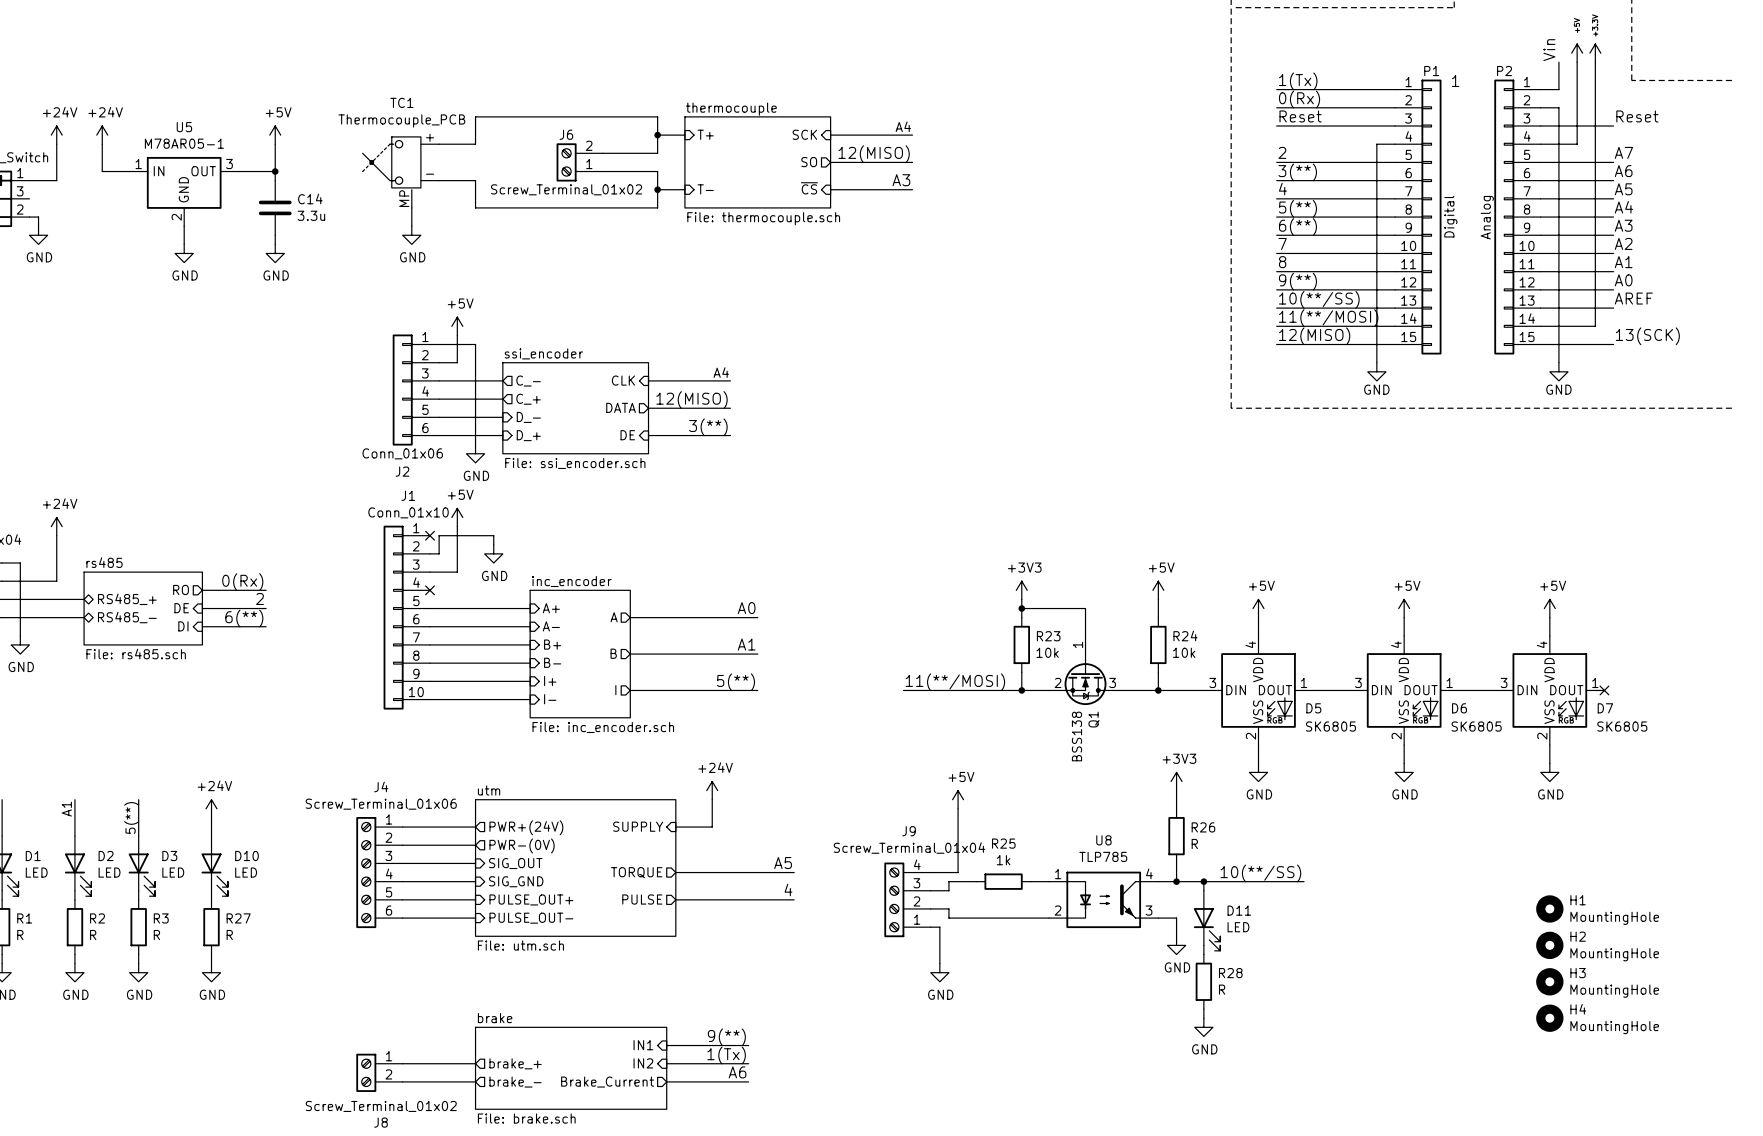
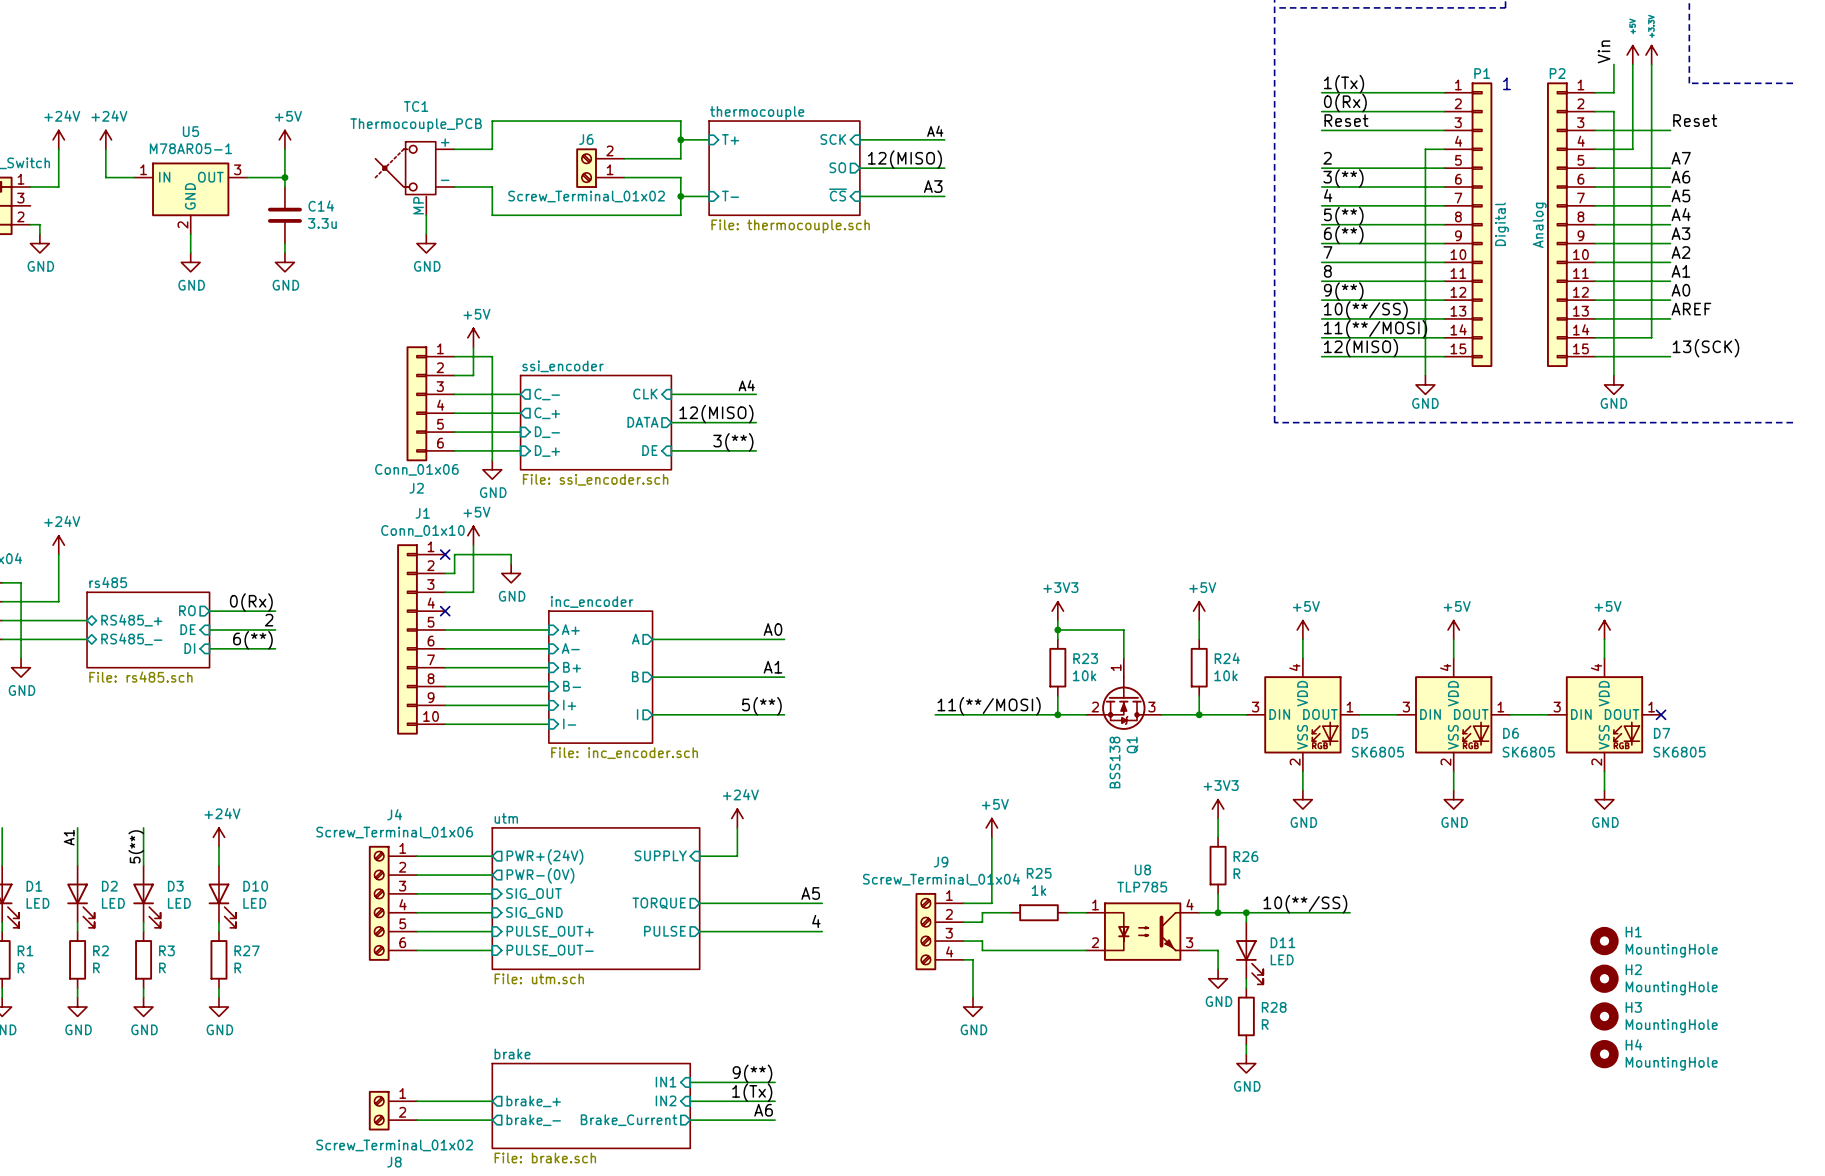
J9 flip: as is (894, 899) -> up-down (925, 931)

